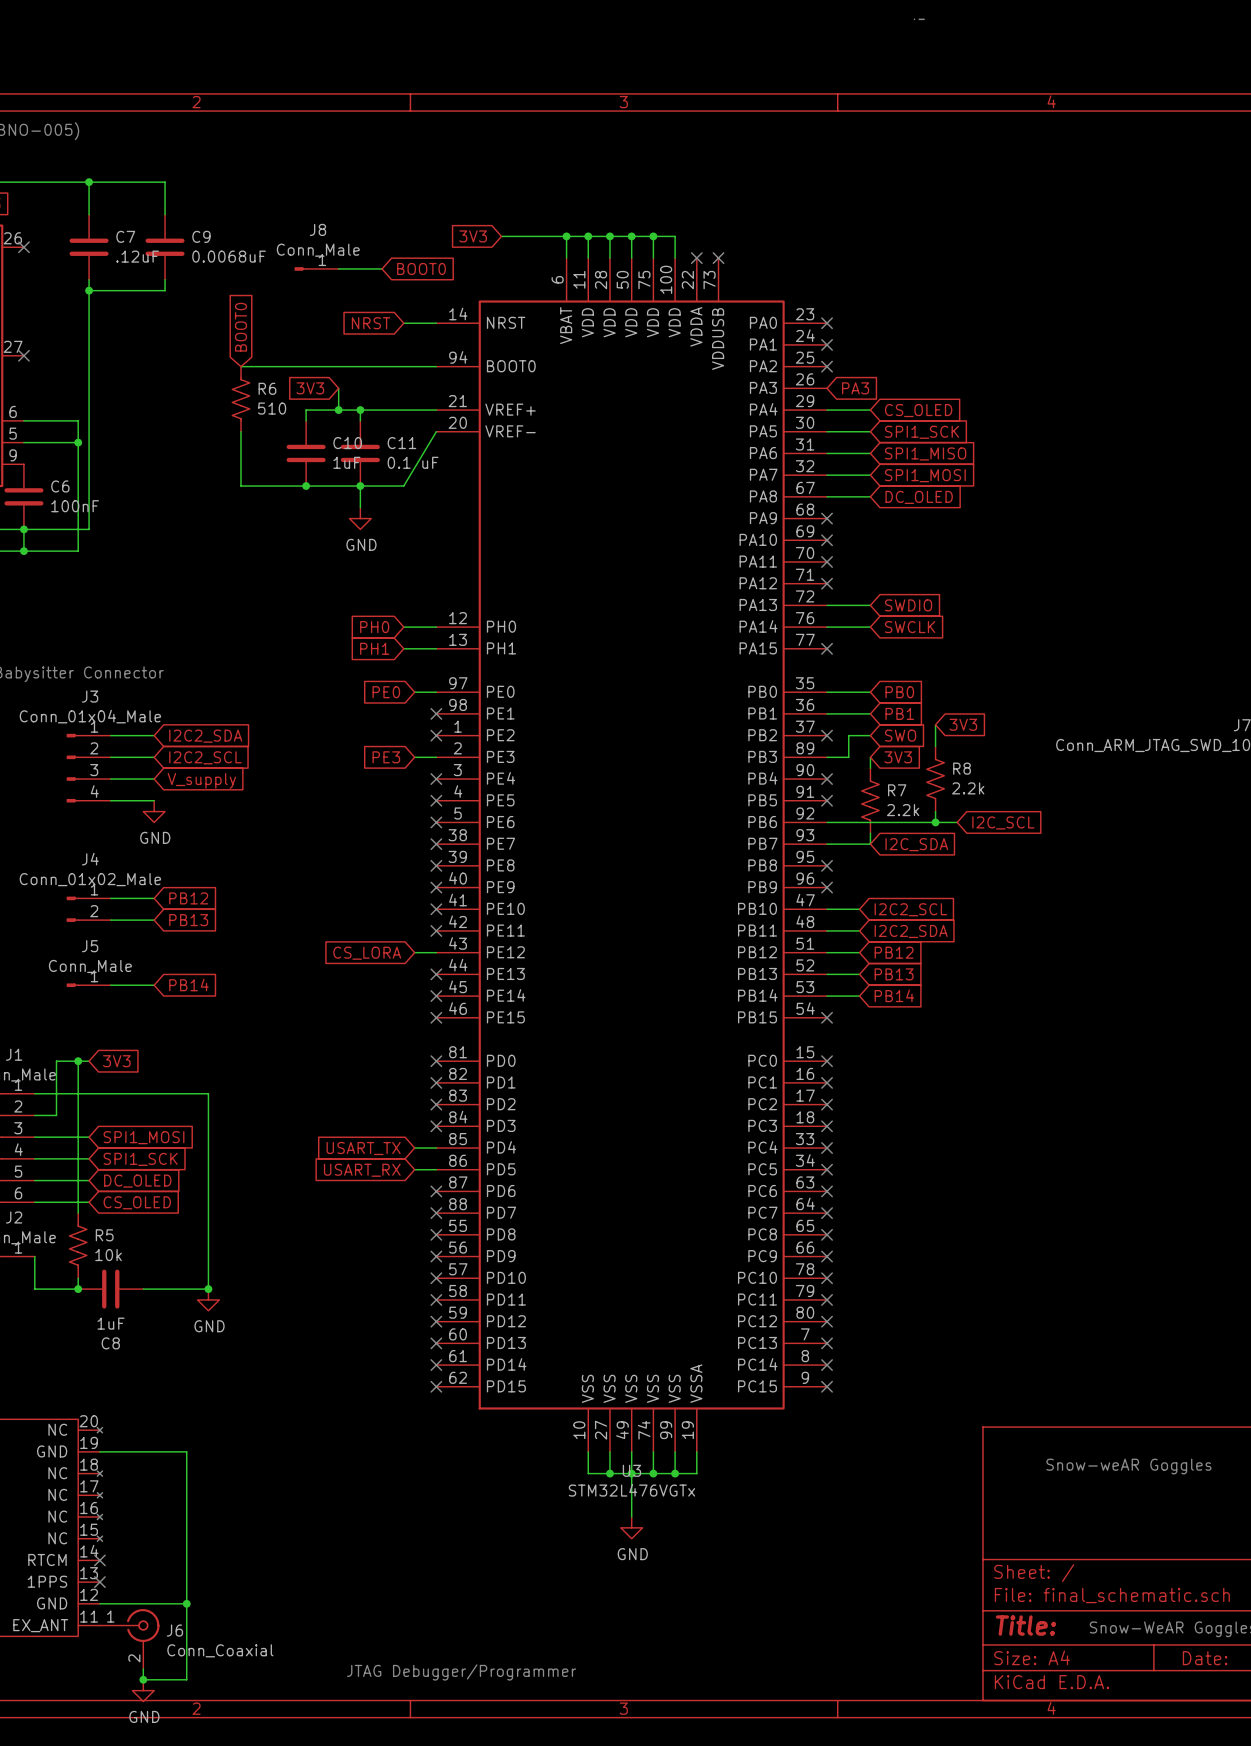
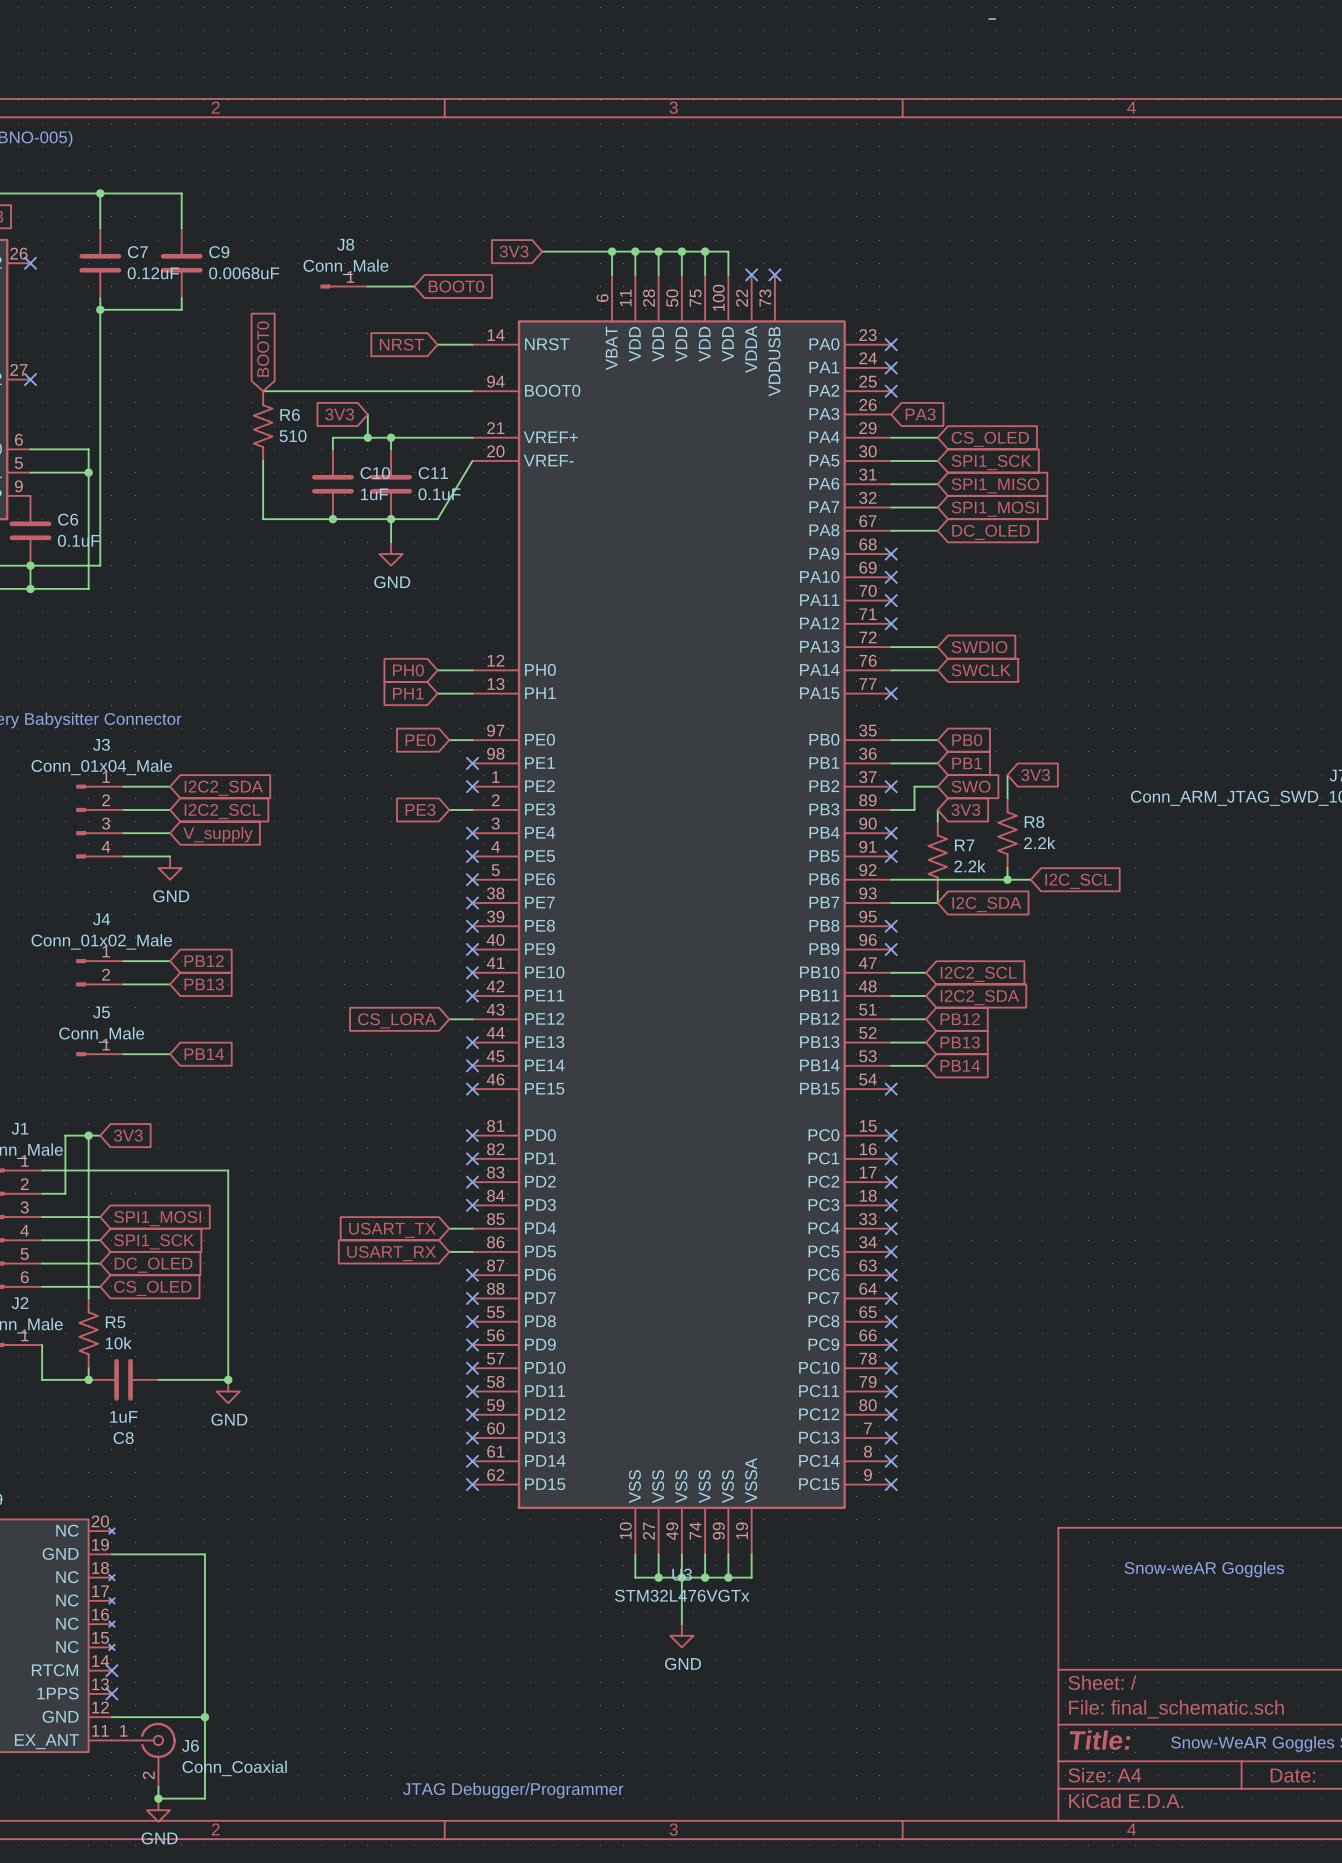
C7 value: .12uF (137, 256) -> 0.12uF (153, 273)
C11 value: 0.1 uF (413, 462) -> 0.1uF (439, 494)
C6 value: 100nF (75, 506) -> 0.1uF (78, 540)

